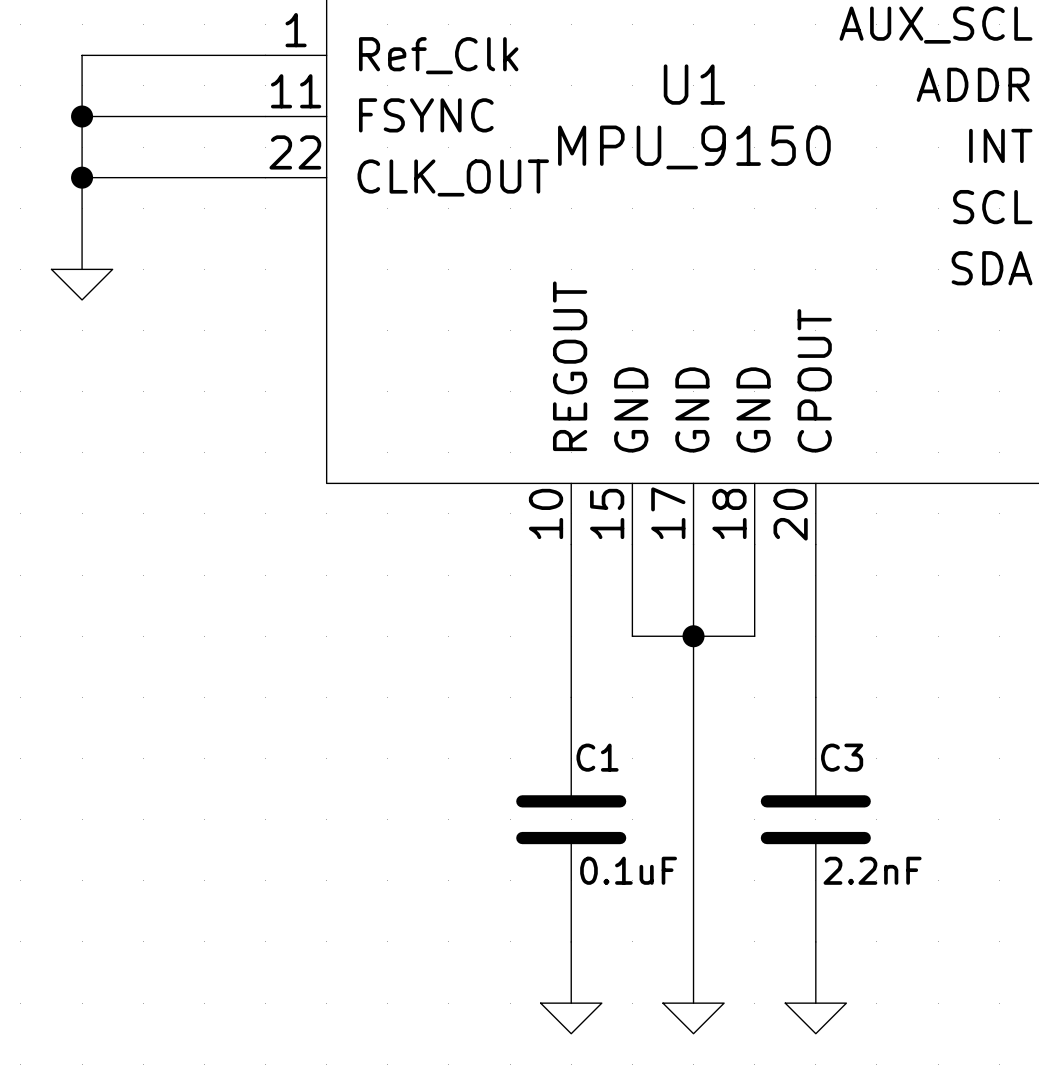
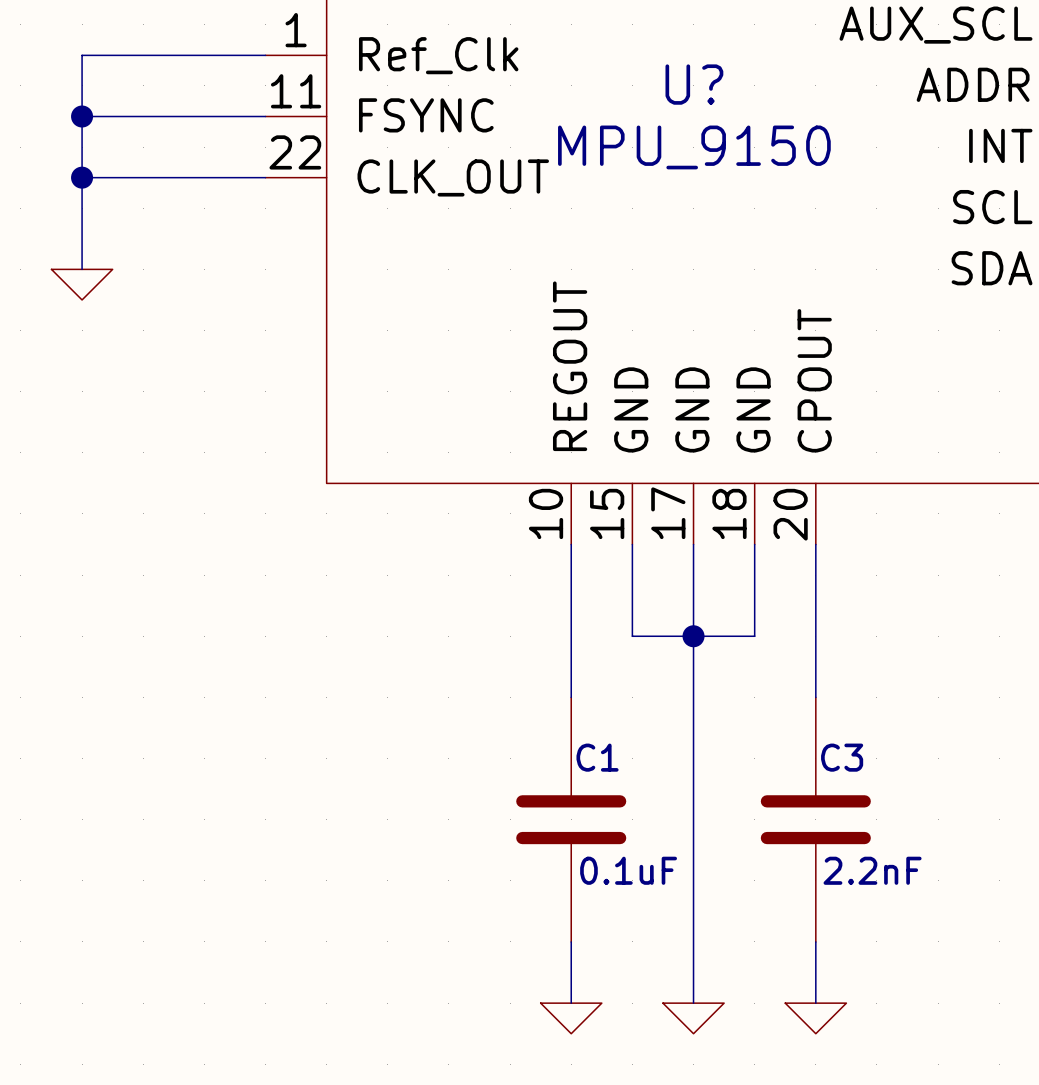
U1 name: U1 (694, 84) -> U? (694, 84)

